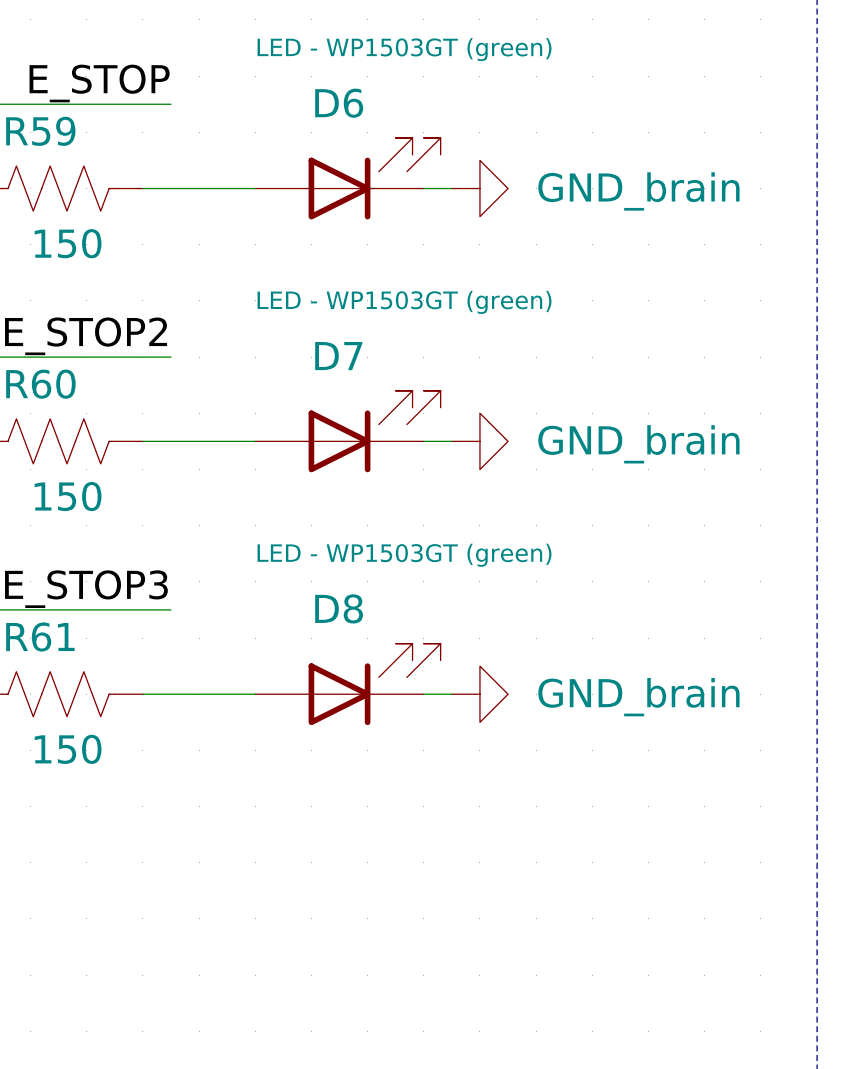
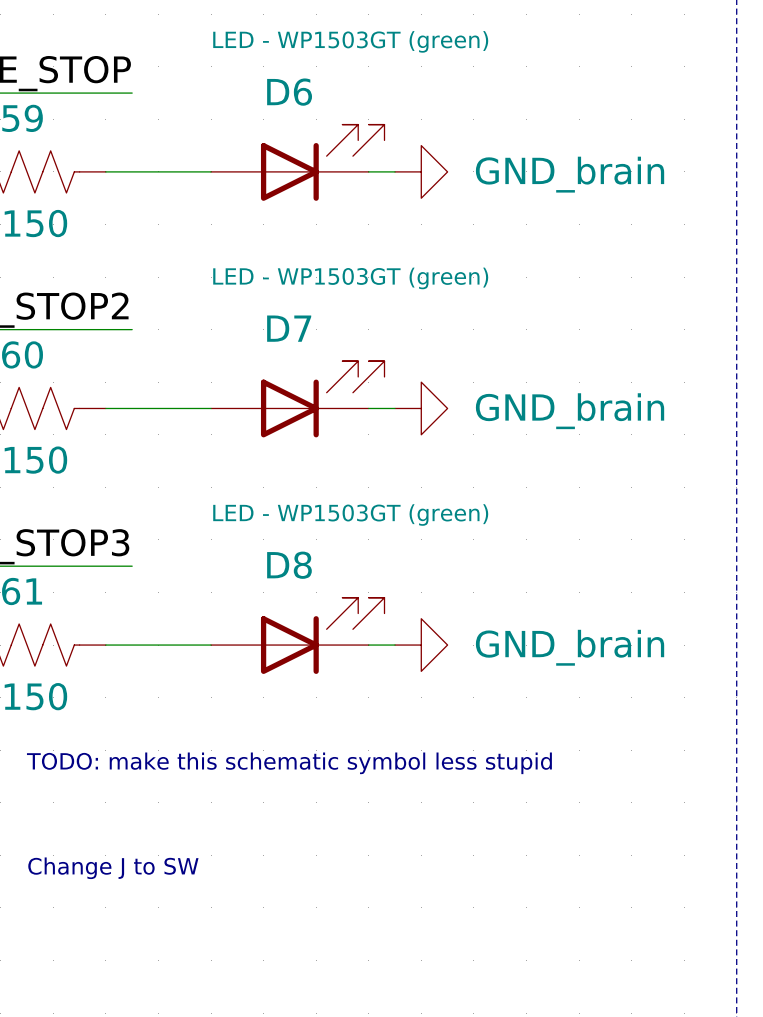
text: none -> TODO: make this schematic symbol less stupid (289, 763)
text: none -> Change J to SW (113, 868)

